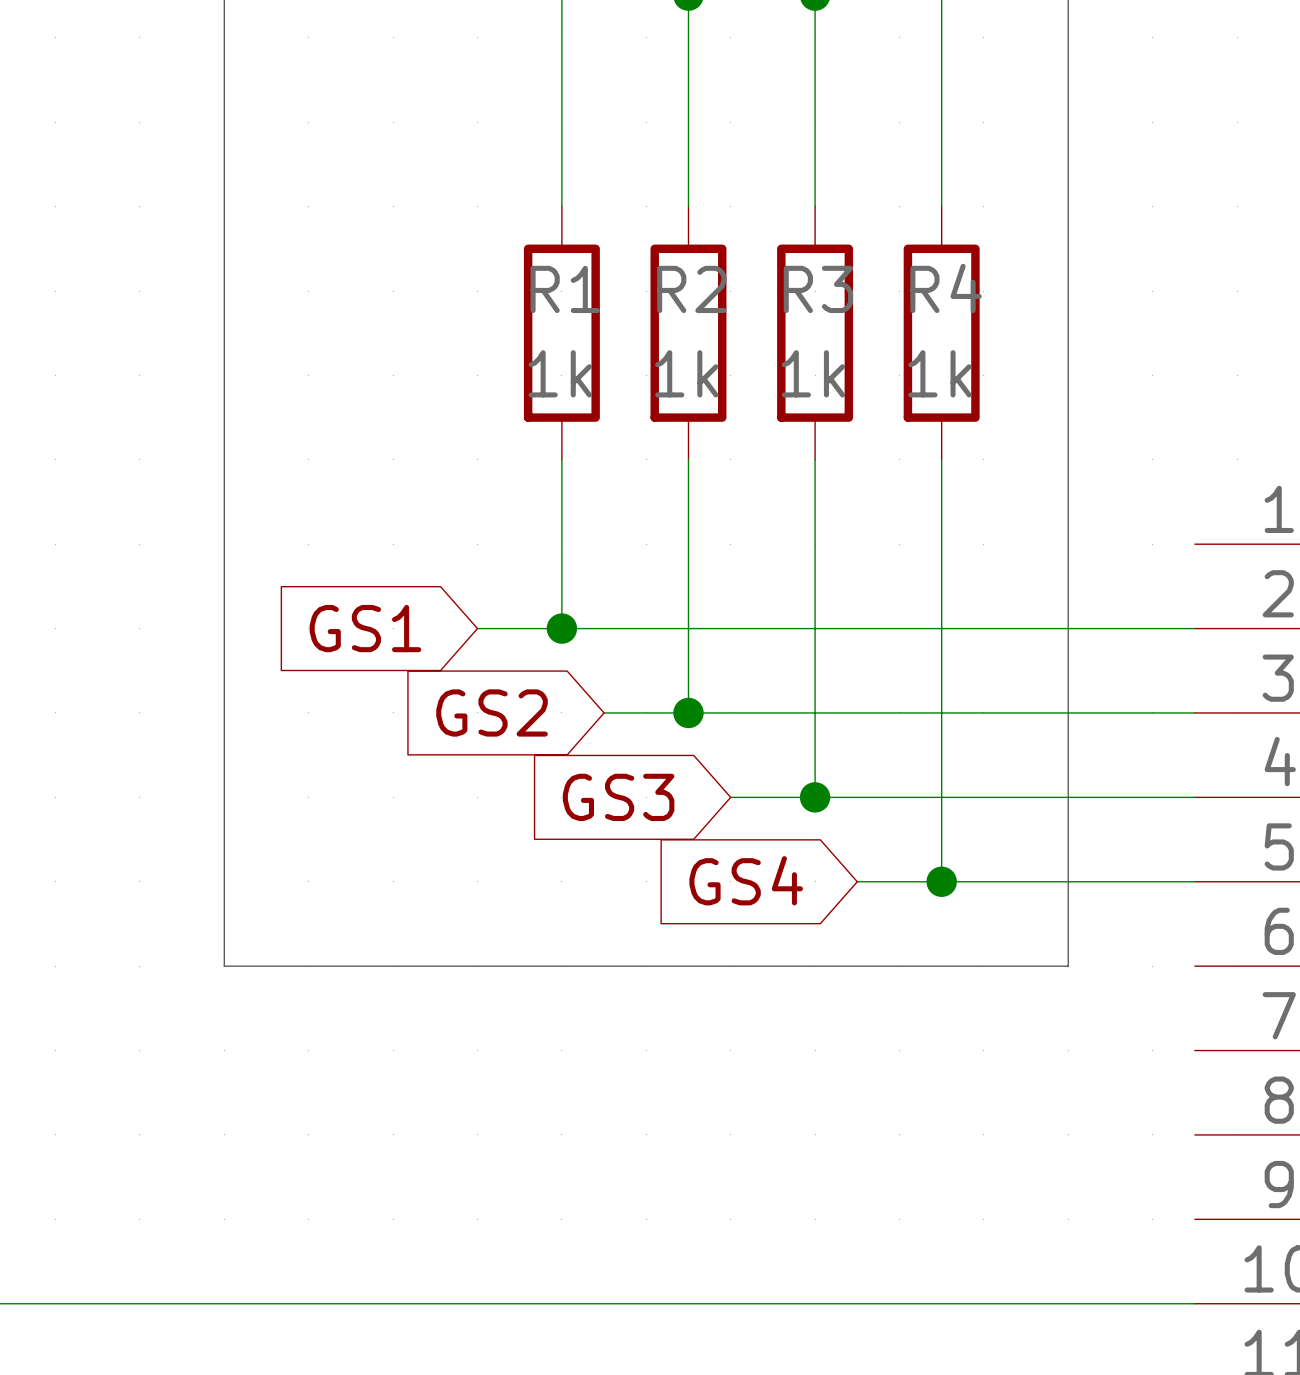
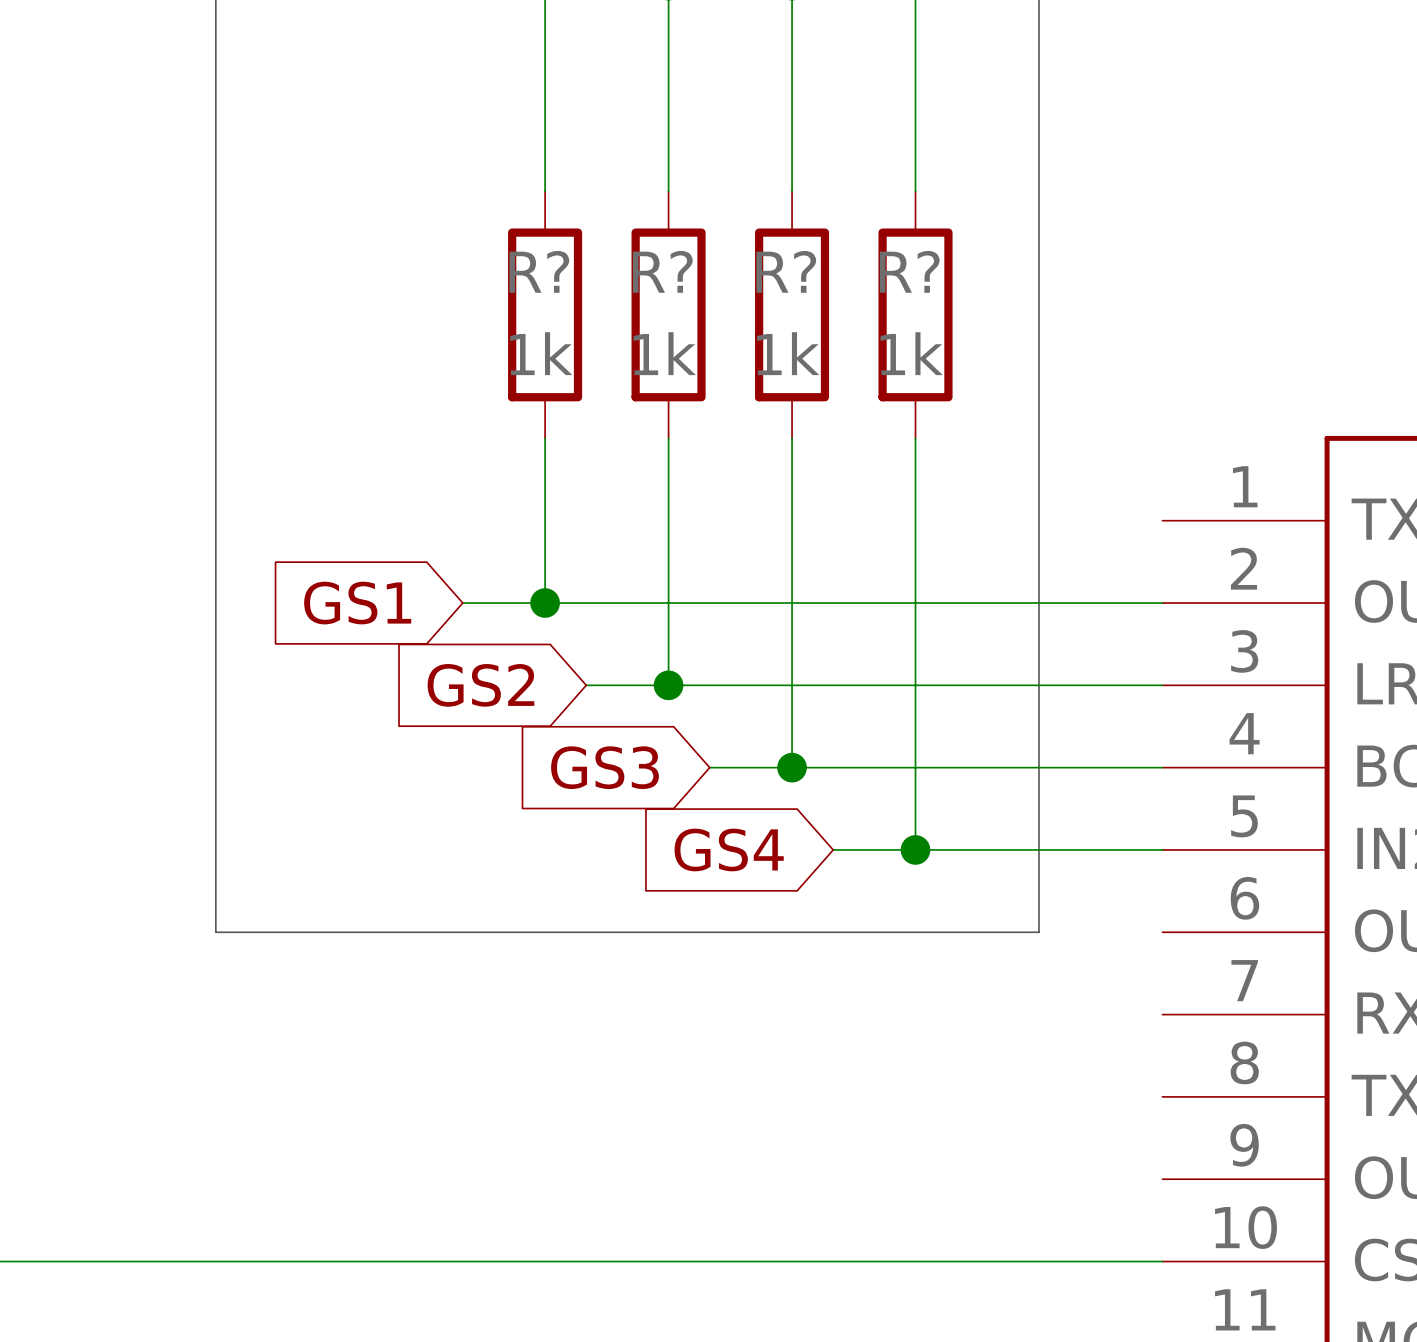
R4 name: R4 (946, 288) -> R? (909, 271)
R1 name: R1 (565, 289) -> R? (539, 271)
R2 name: R2 (691, 289) -> R? (662, 271)
R3 name: R3 (818, 289) -> R? (786, 271)

